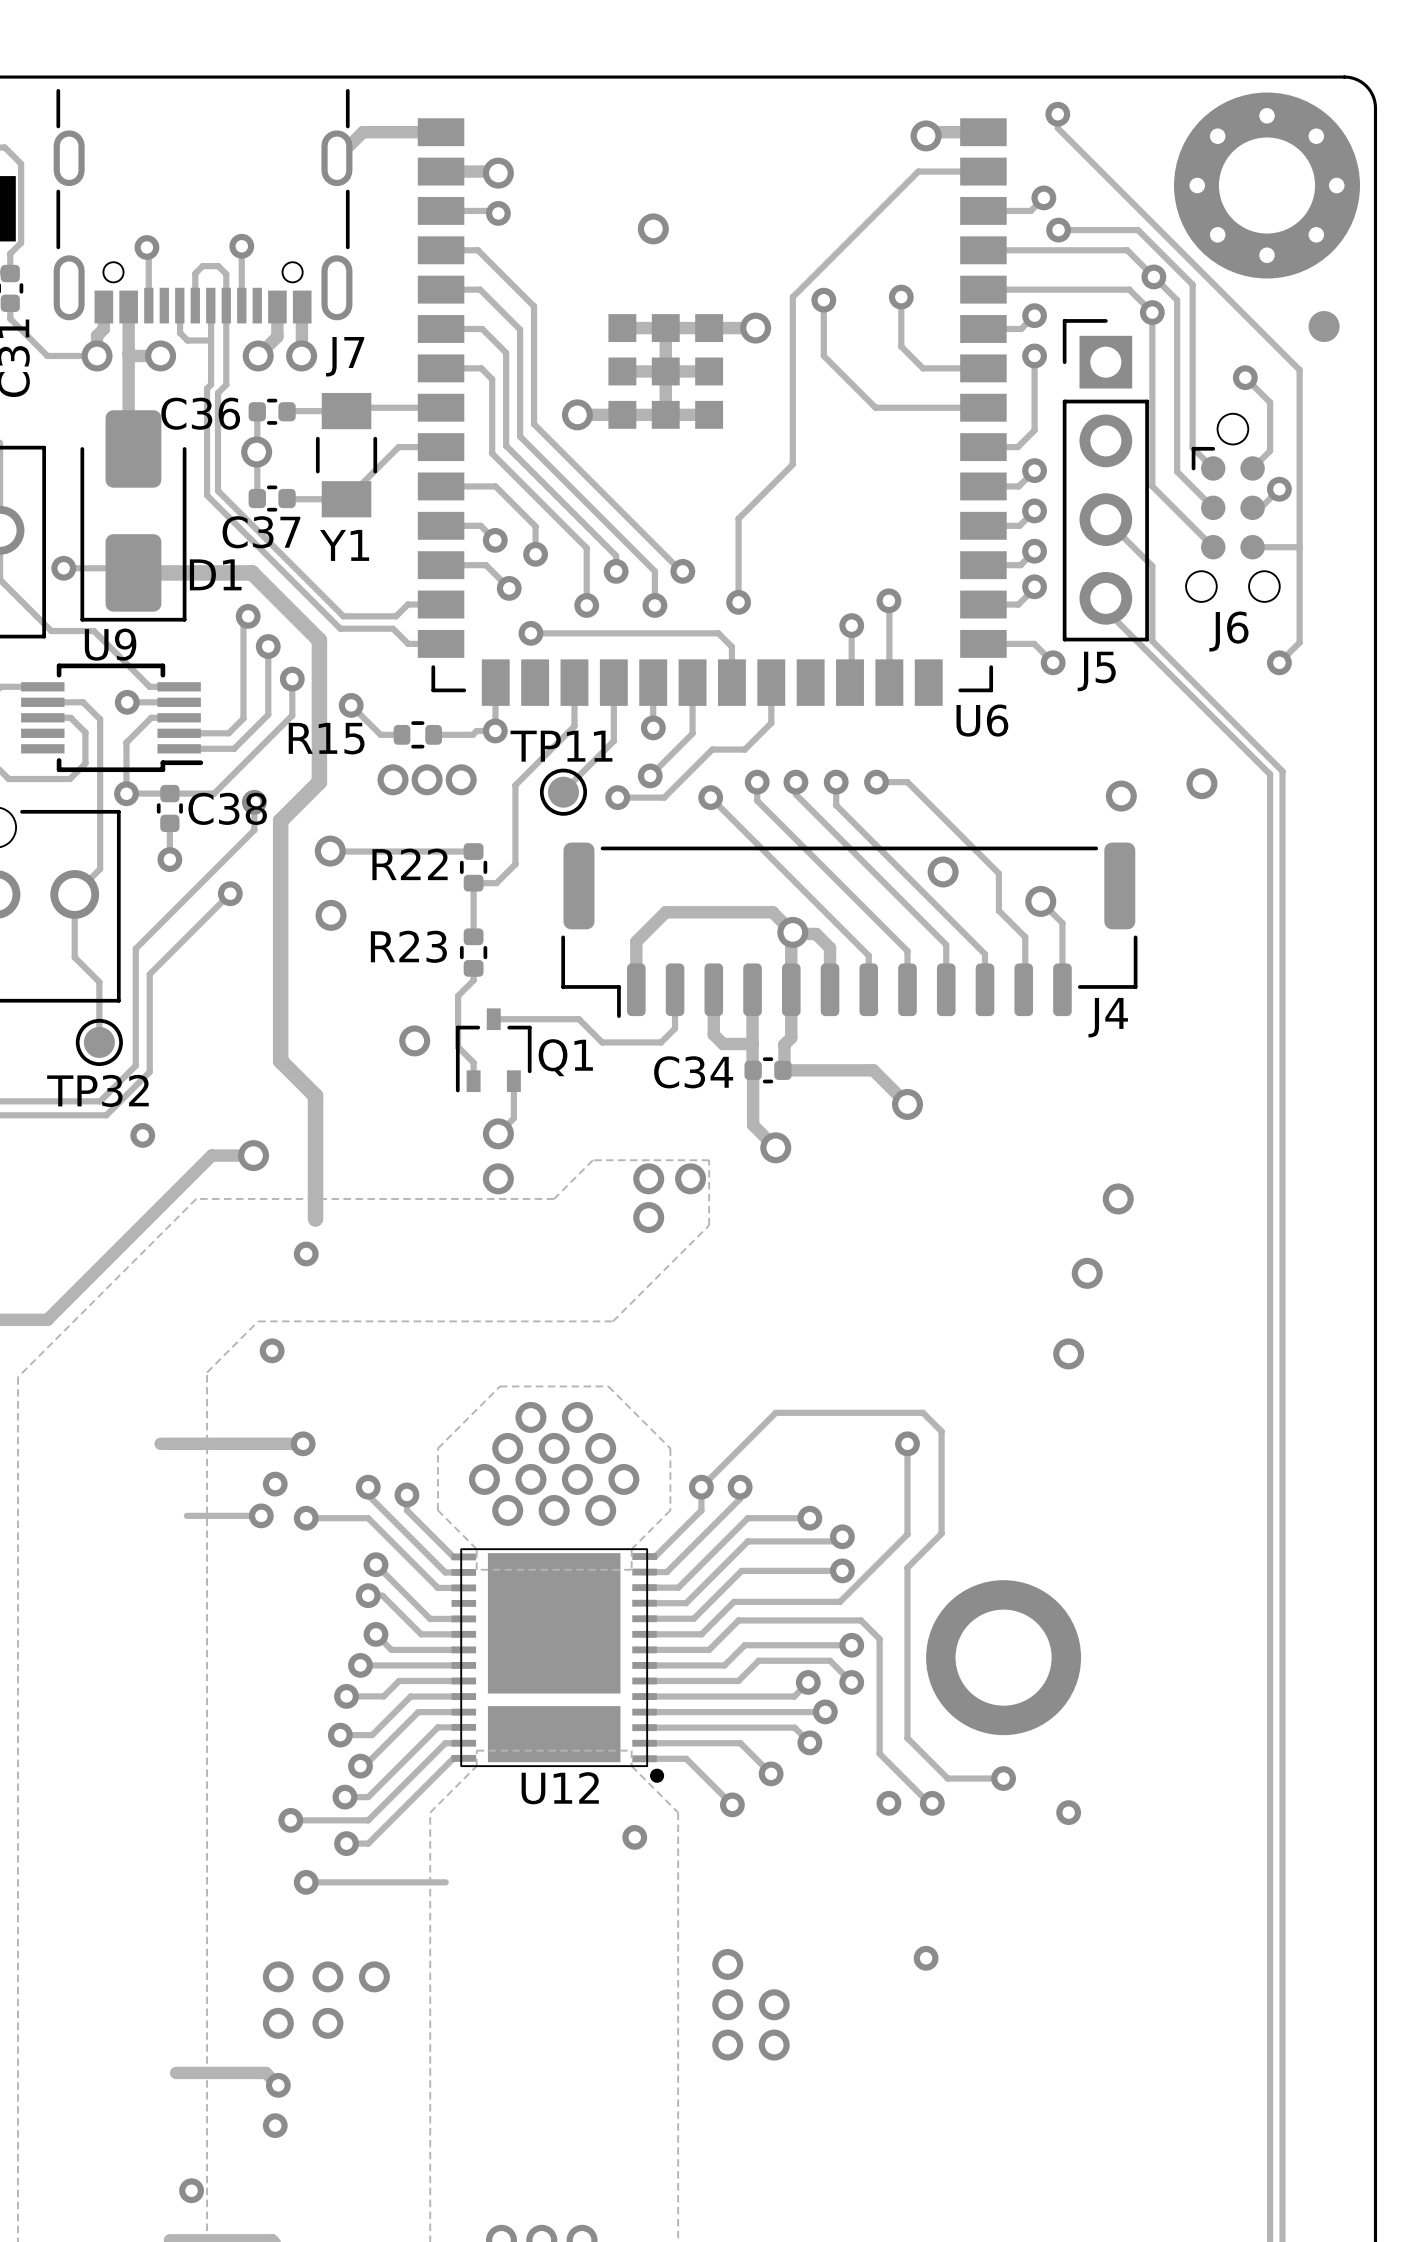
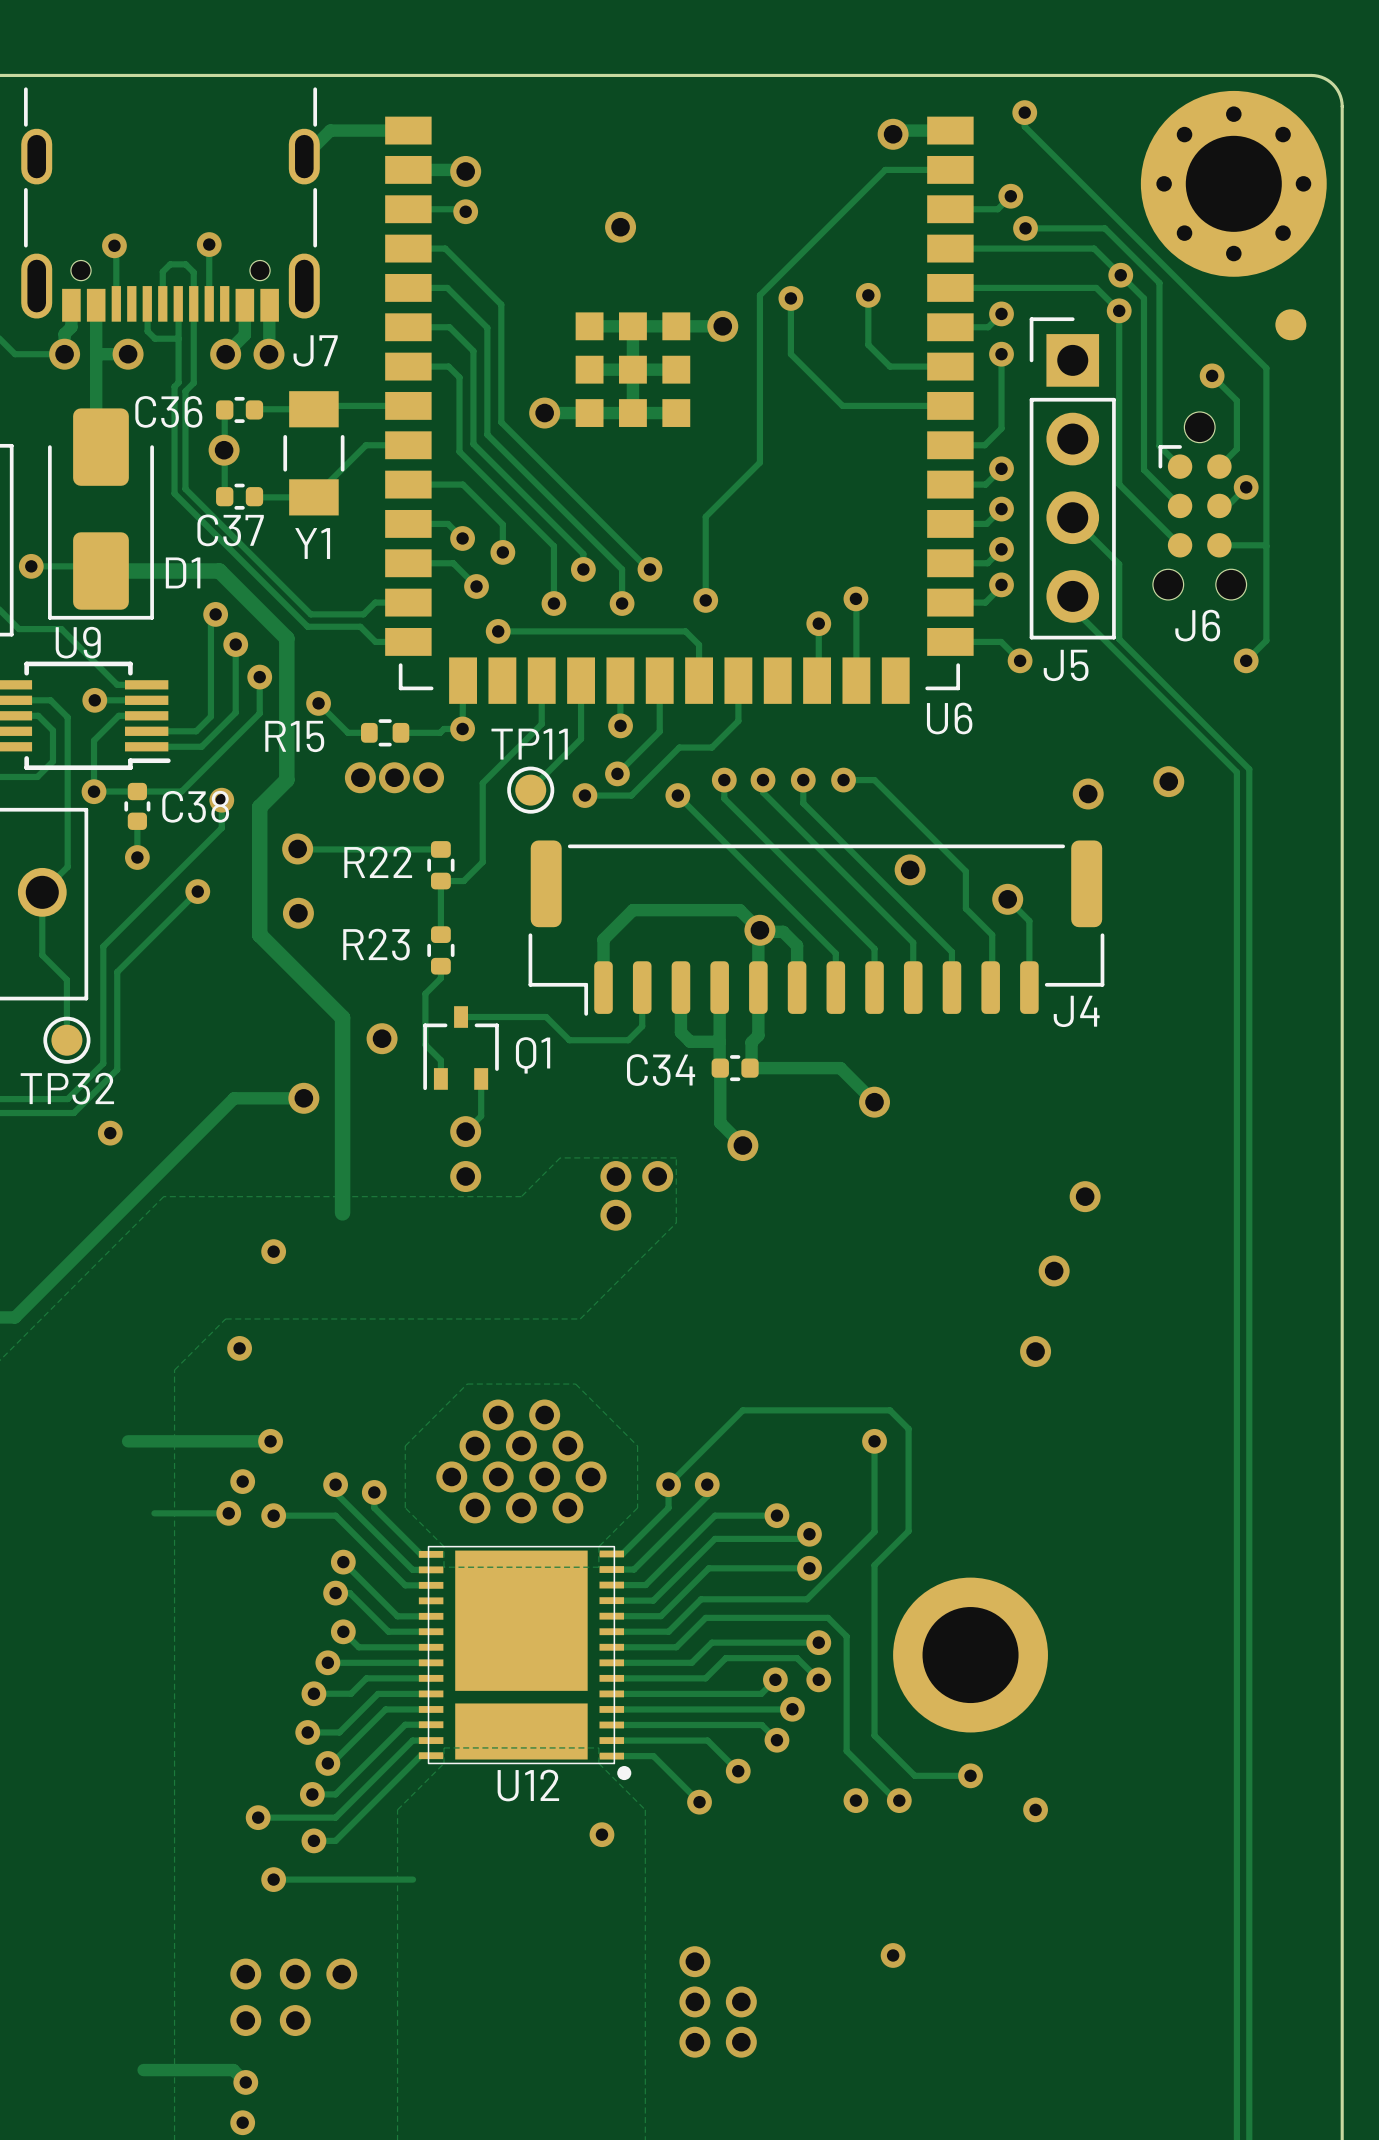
track: (292, 809) (280, 820) (280, 1061) (315, 1095) (315, 1219) -> (259, 807) (259, 934) (342, 1017) (342, 1212)
track: (211, 1155) (253, 1155) -> (179, 1153) (234, 1098) (303, 1098)
via position: (253, 1155) -> (303, 1098)

